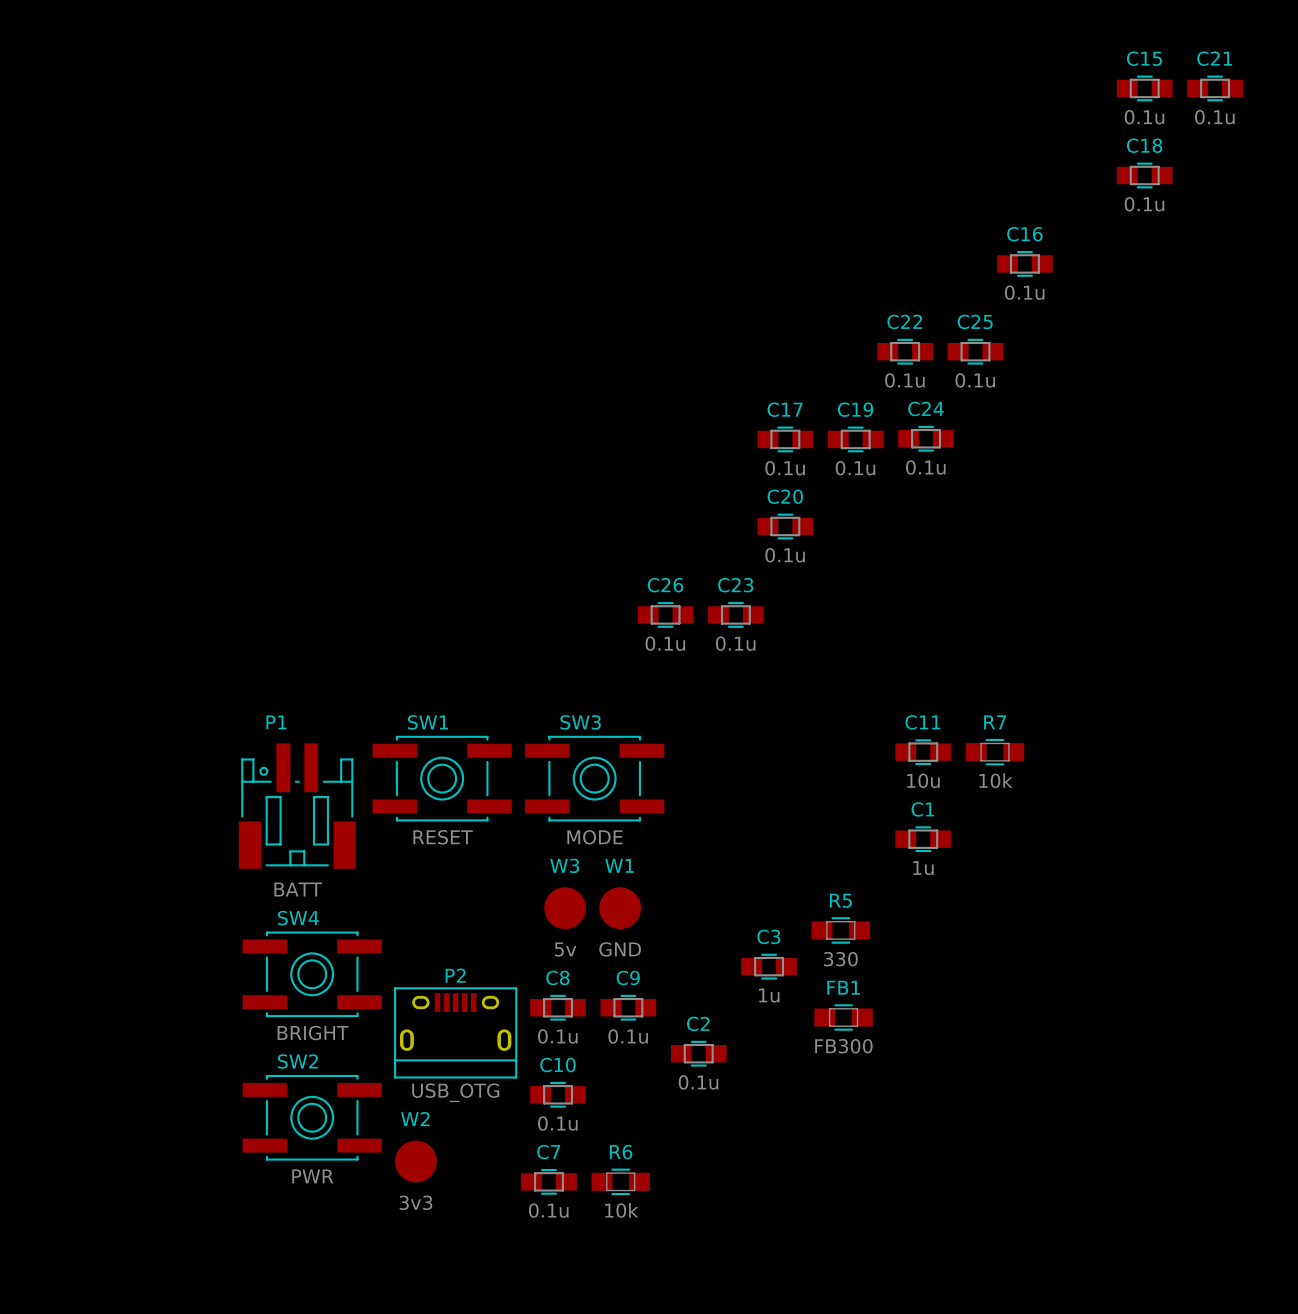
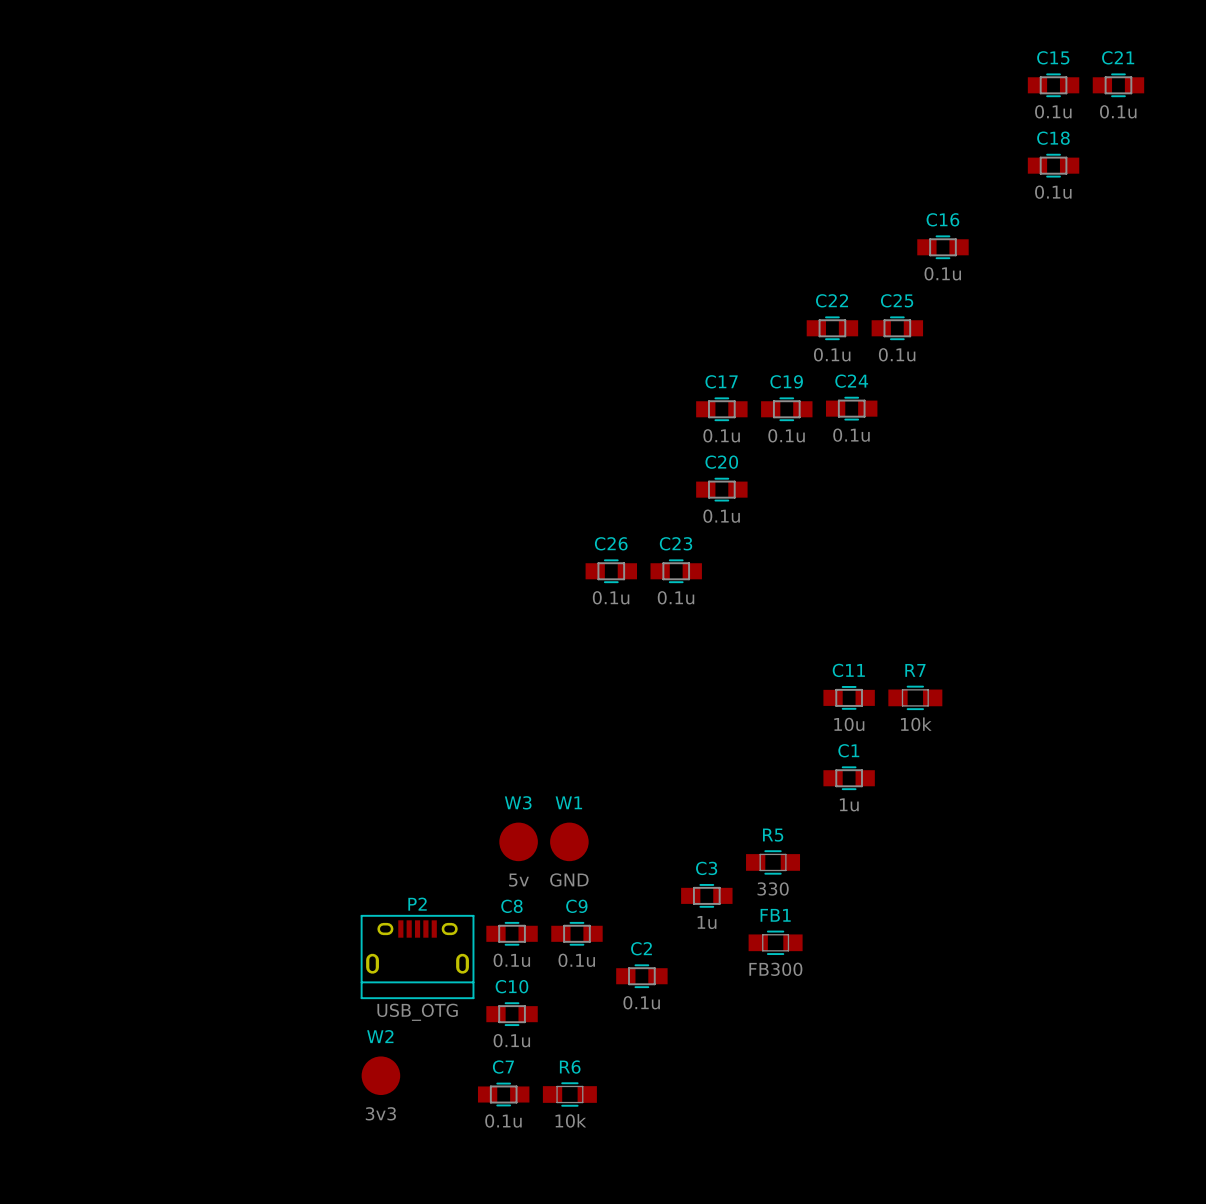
SW1: RESET (442, 778) -> none
SW3: MODE (594, 778) -> none
P1: BATT (297, 806) -> none
SW4: BRIGHT (312, 974) -> none
SW2: PWR (312, 1117) -> none

